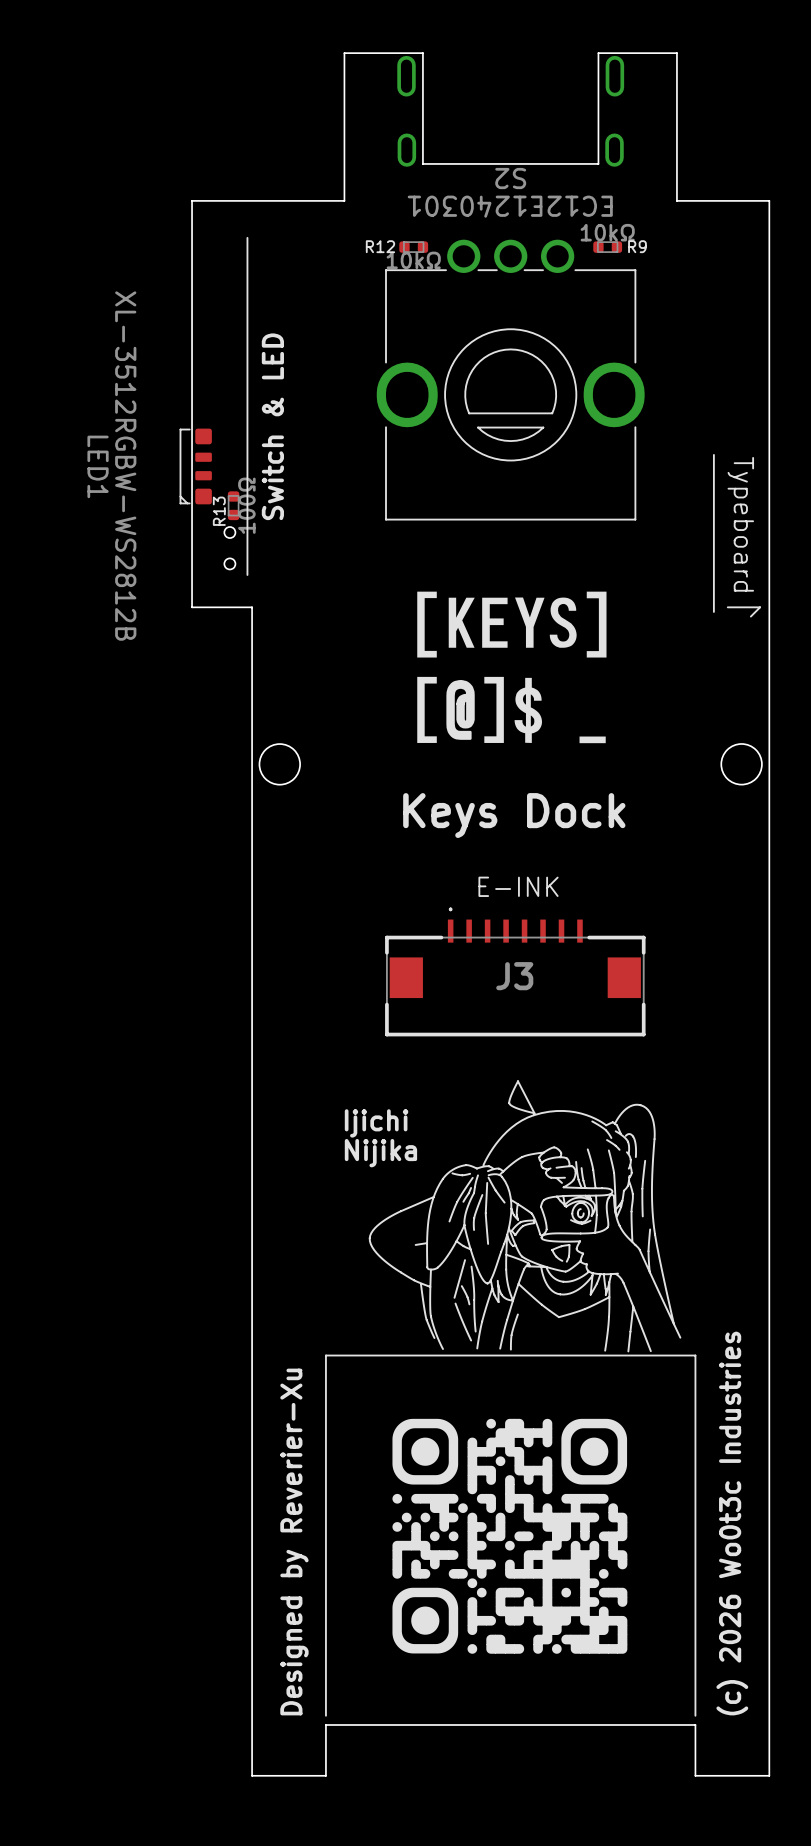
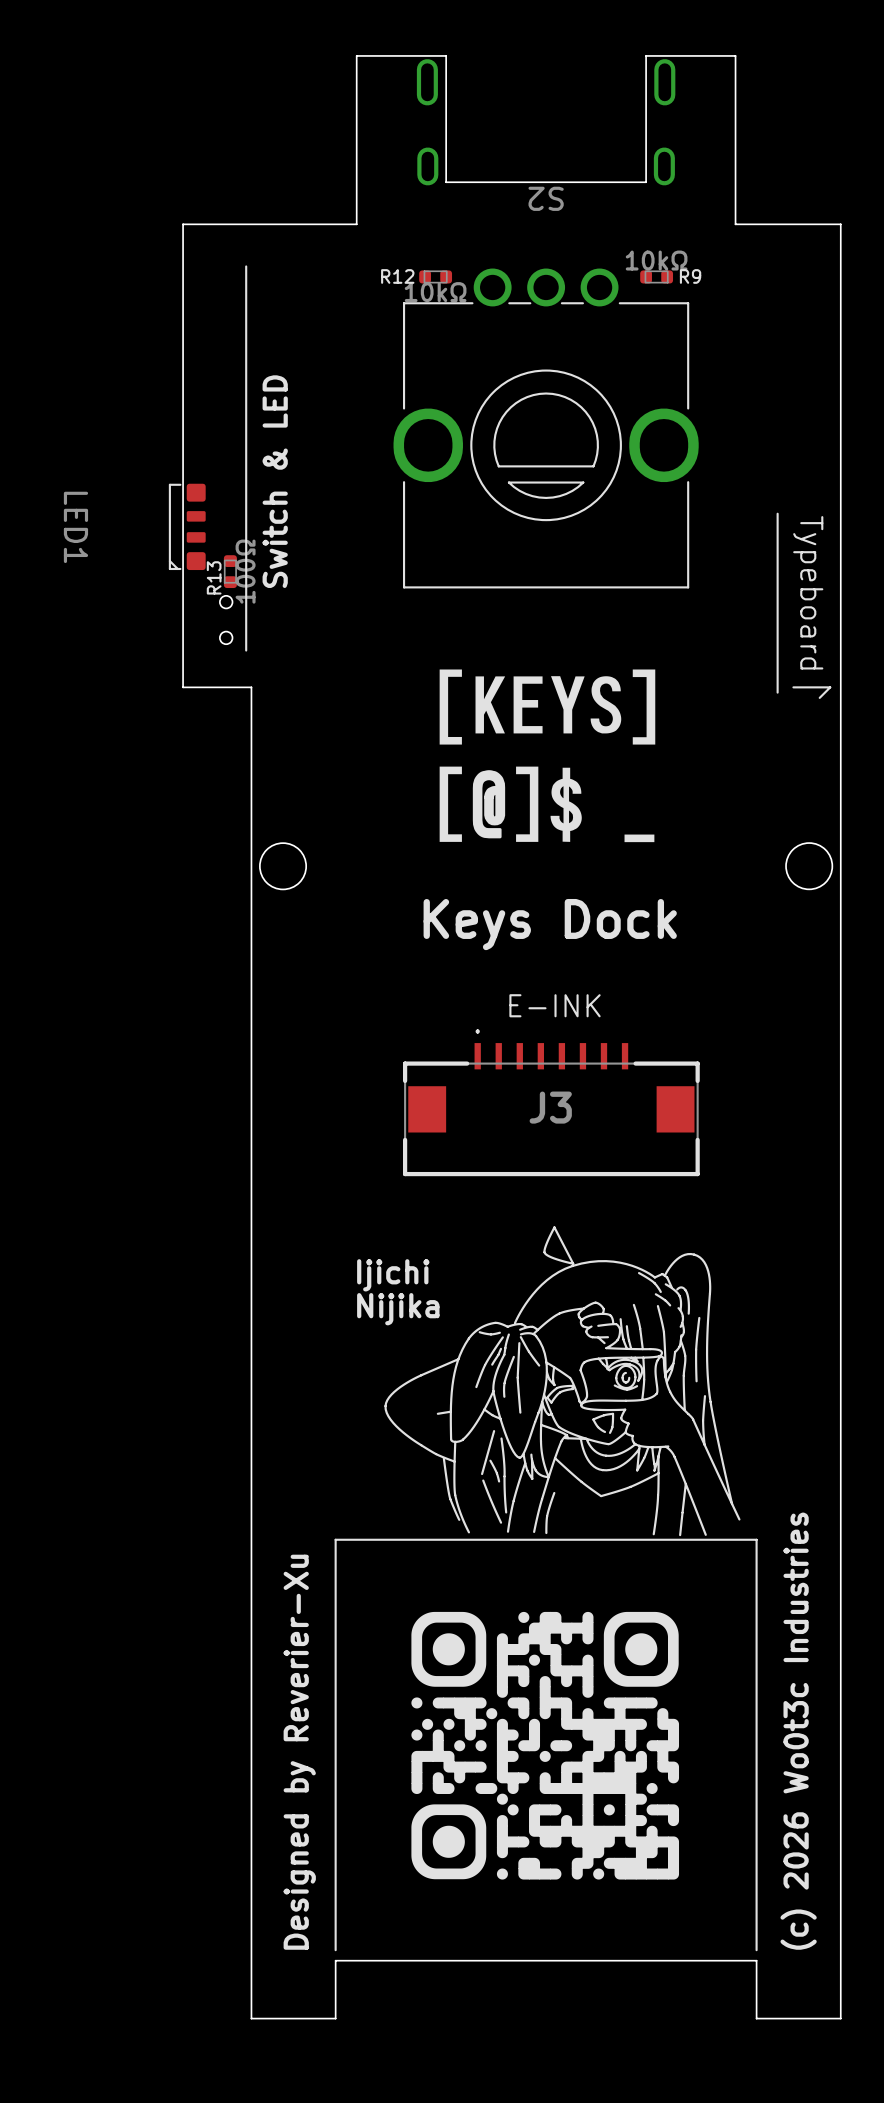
S2 value: EC12E1240301 (510, 206) -> none
LED1 value: XL-3512RGBW-WS2812B (125, 466) -> none

